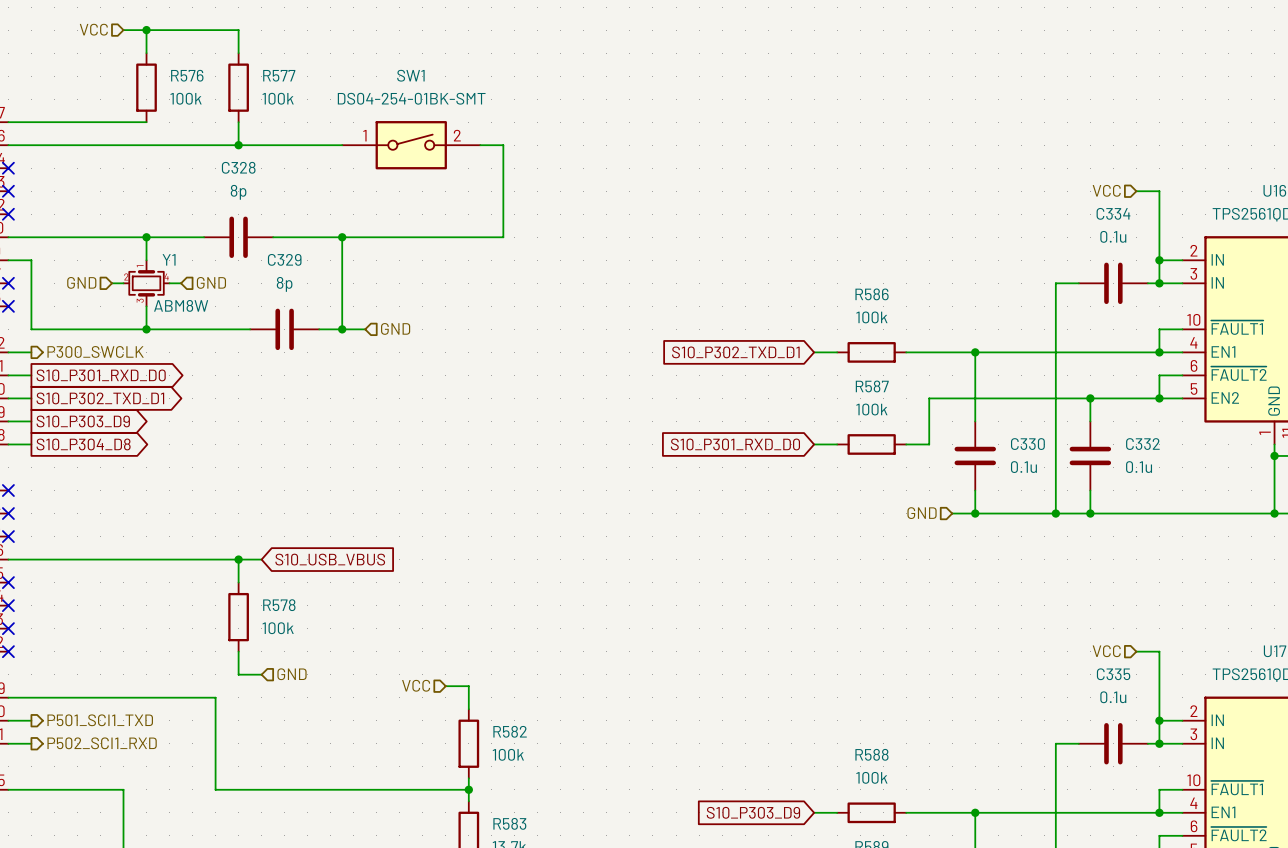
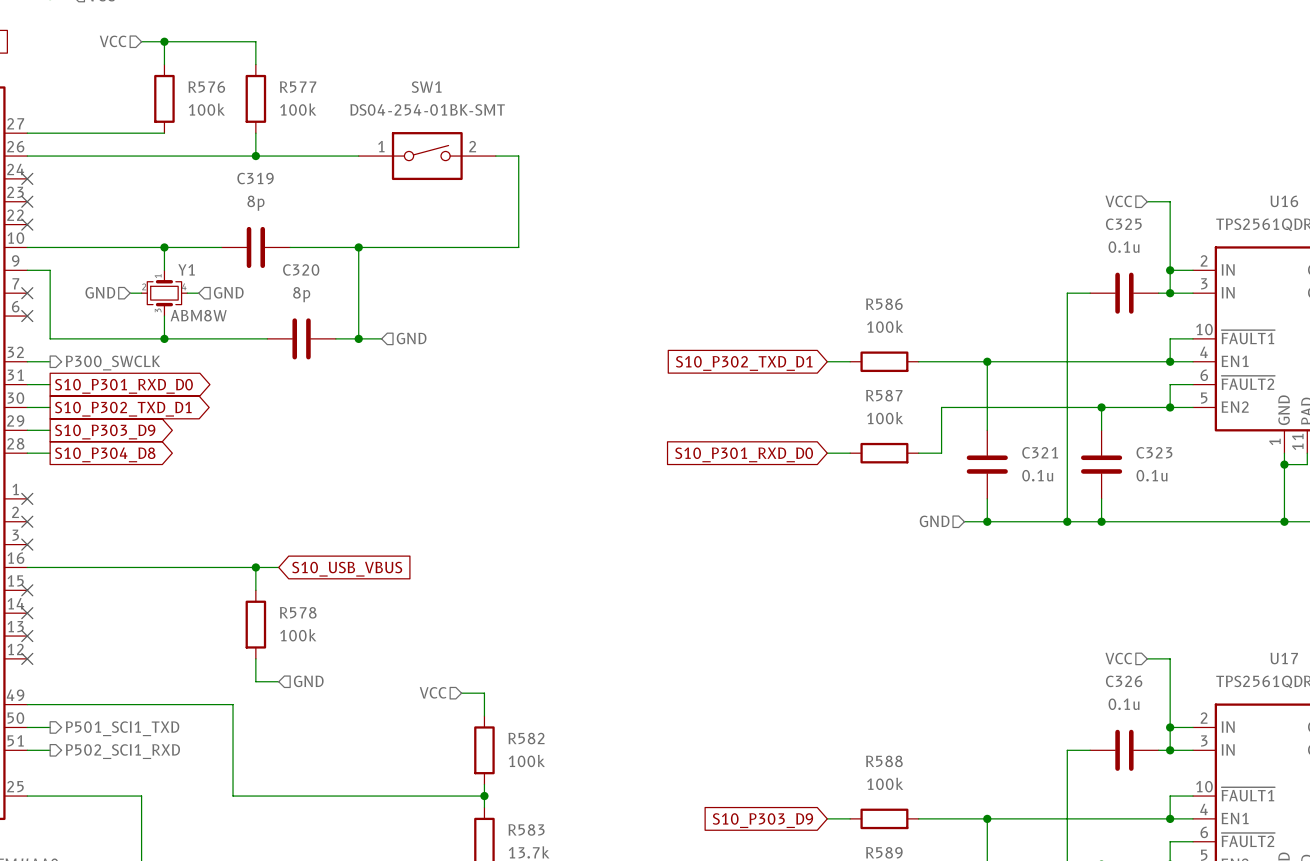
C328 name: C328 (238, 167) -> C319 (255, 178)
C334 name: C334 (1113, 213) -> C325 (1123, 224)
C329 name: C329 (284, 259) -> C320 (301, 269)
C330 name: C330 (1027, 444) -> C321 (1040, 452)
C332 name: C332 (1142, 444) -> C323 (1154, 452)
C335 name: C335 (1113, 674) -> C326 (1124, 681)

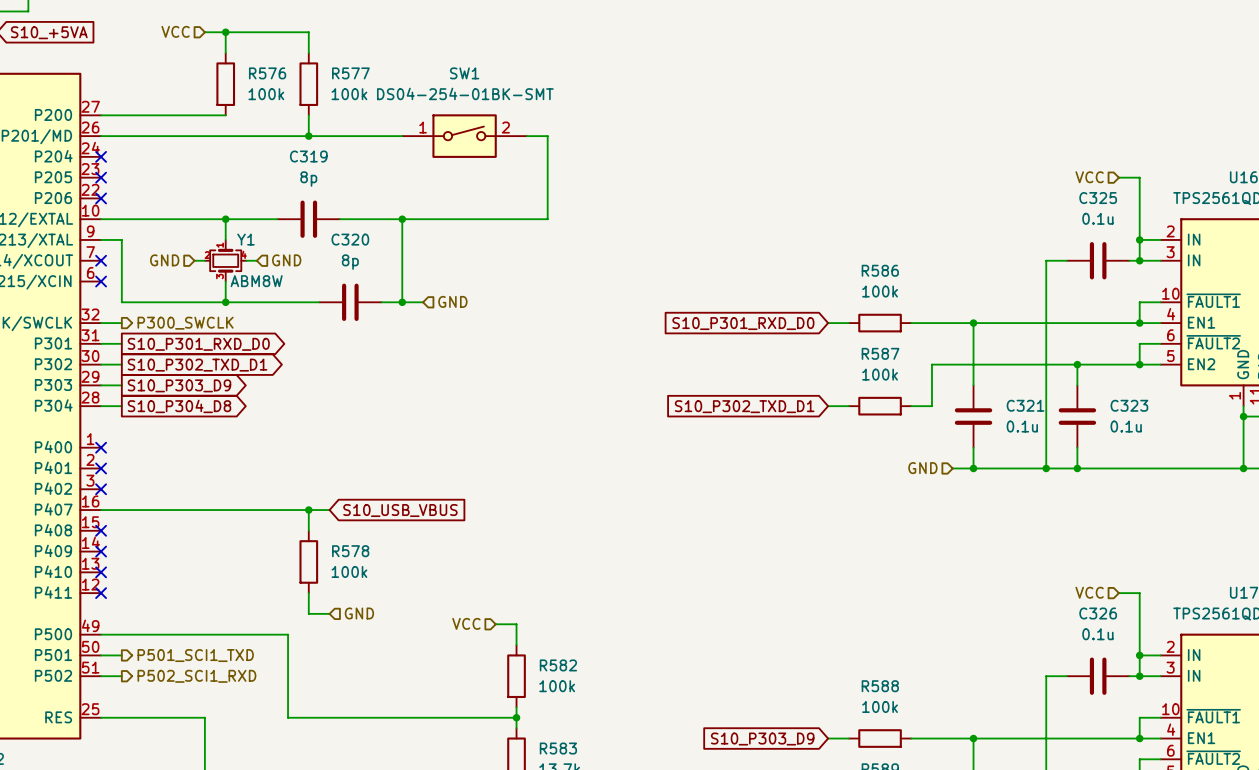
global label: S10_P302_TXD_D1 (744, 363) -> S10_P301_RXD_D0 (743, 323)
global label: S10_P301_RXD_D0 (744, 454) -> S10_P302_TXD_D1 (744, 406)

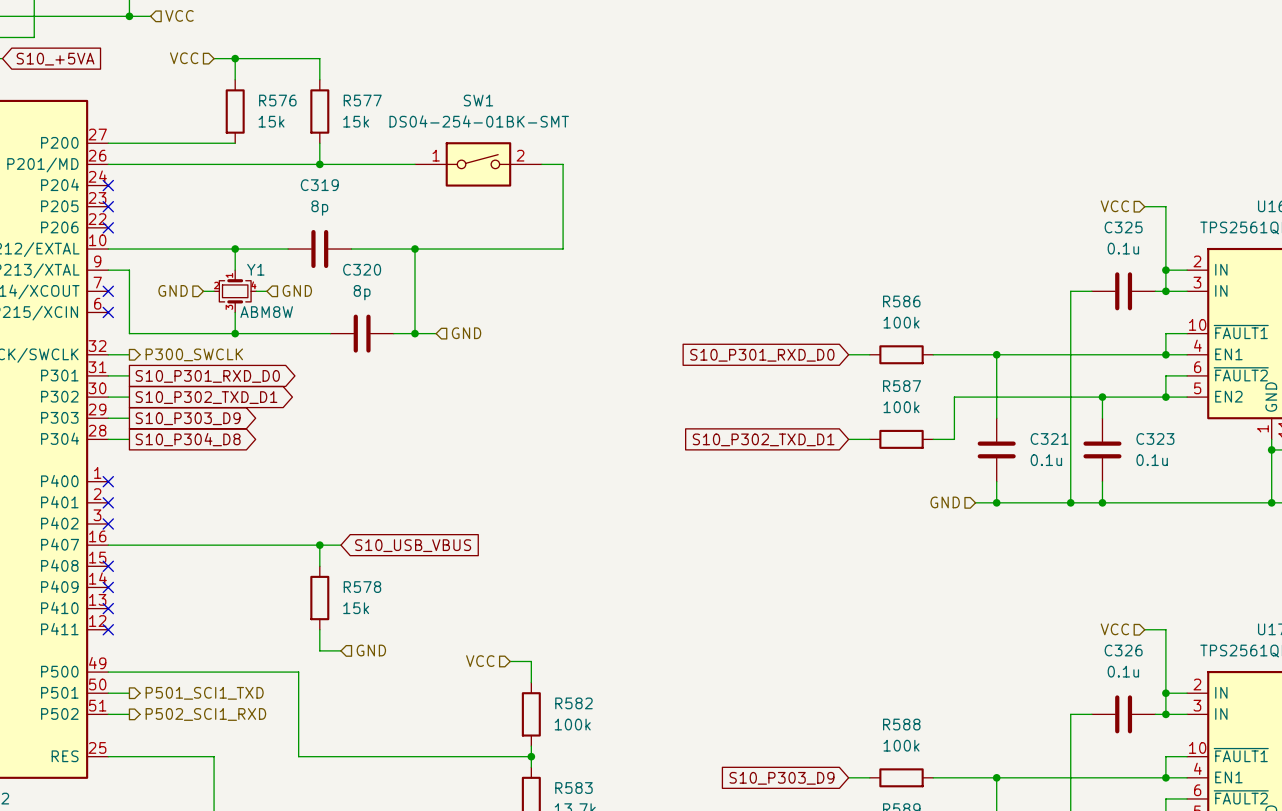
R576 value: 100k (266, 94) -> 15k (271, 121)
R577 value: 100k (349, 94) -> 15k (356, 121)
R578 value: 100k (349, 571) -> 15k (356, 608)

